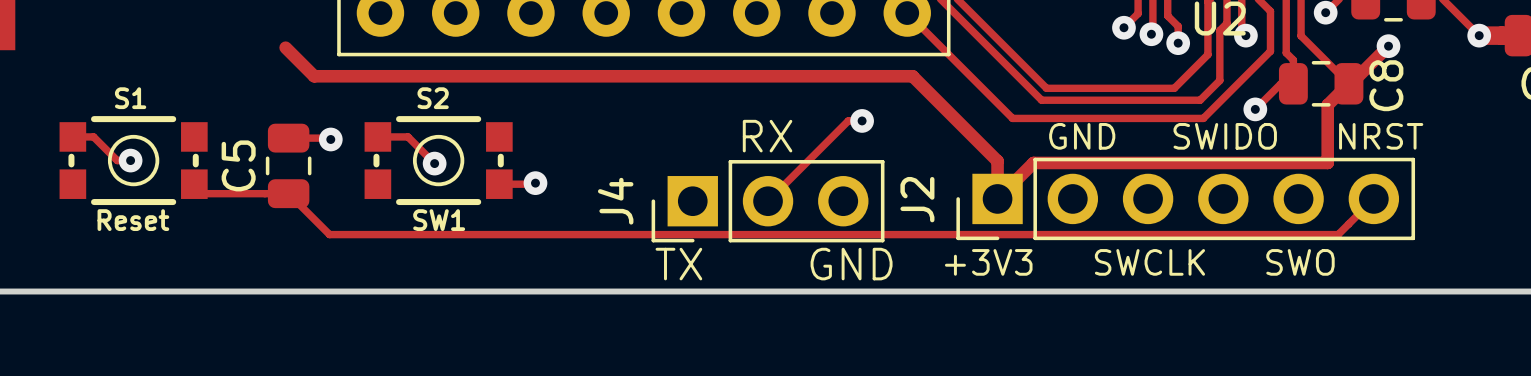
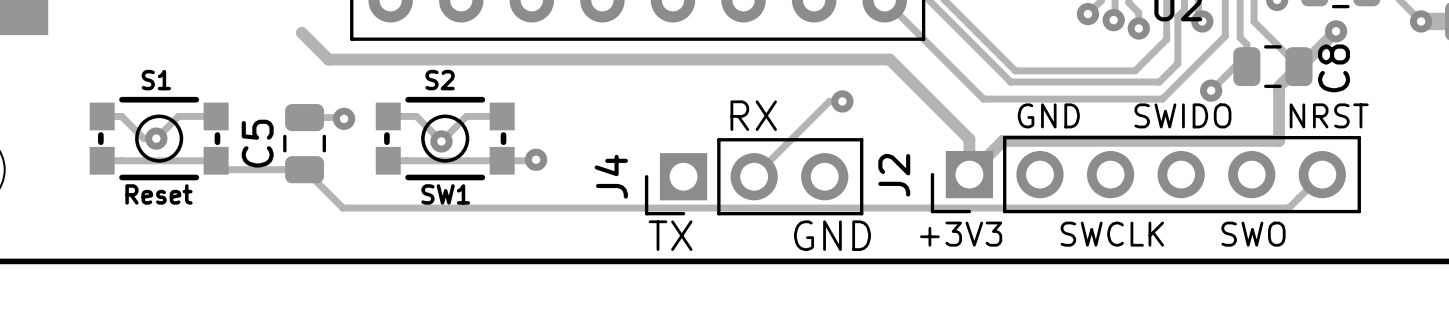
track: none -> (216, 116) (178, 116) (156, 138)
track: none -> (502, 116) (466, 116) (441, 141)
track: none -> (102, 160) (216, 160)
track: none -> (388, 160) (502, 160)

